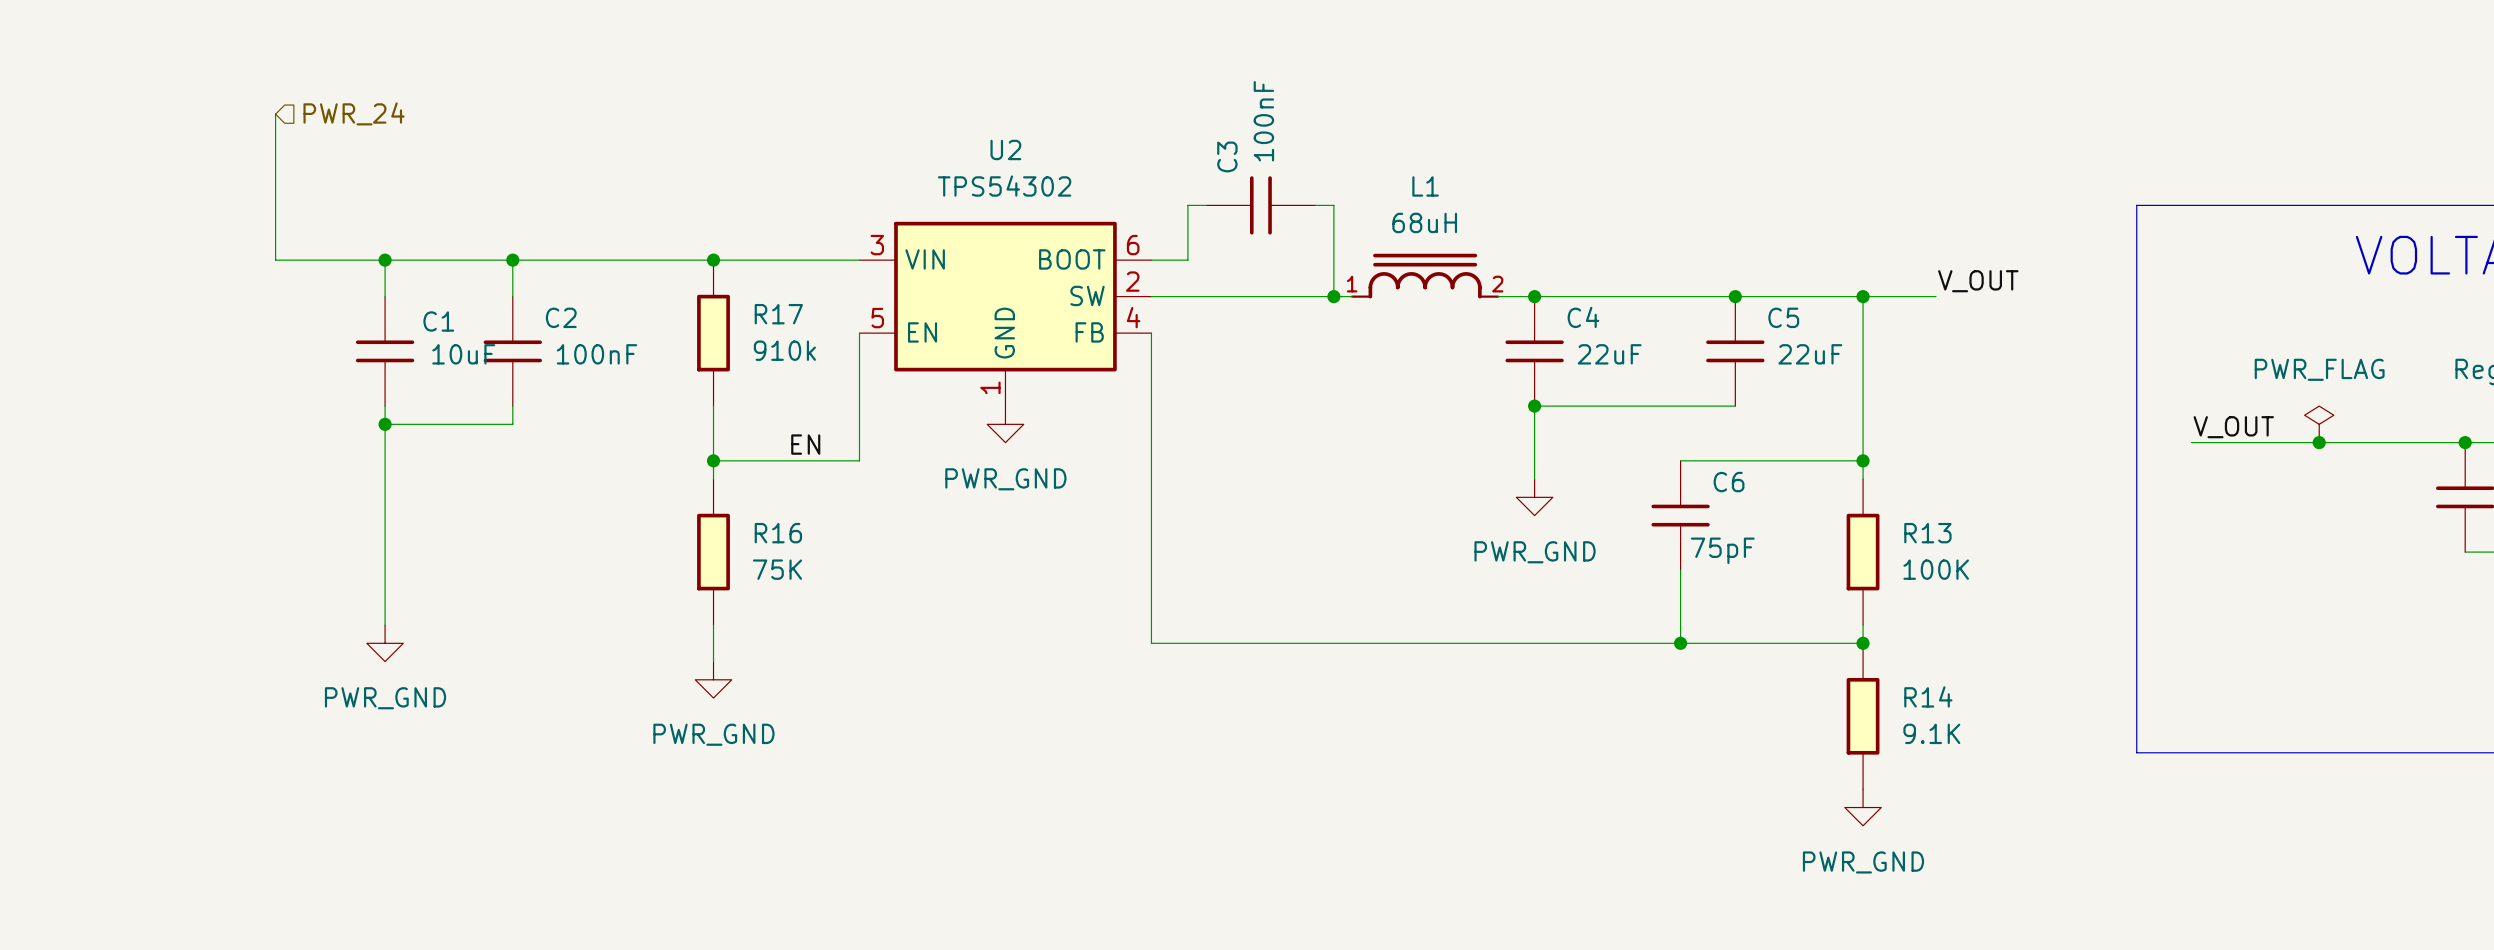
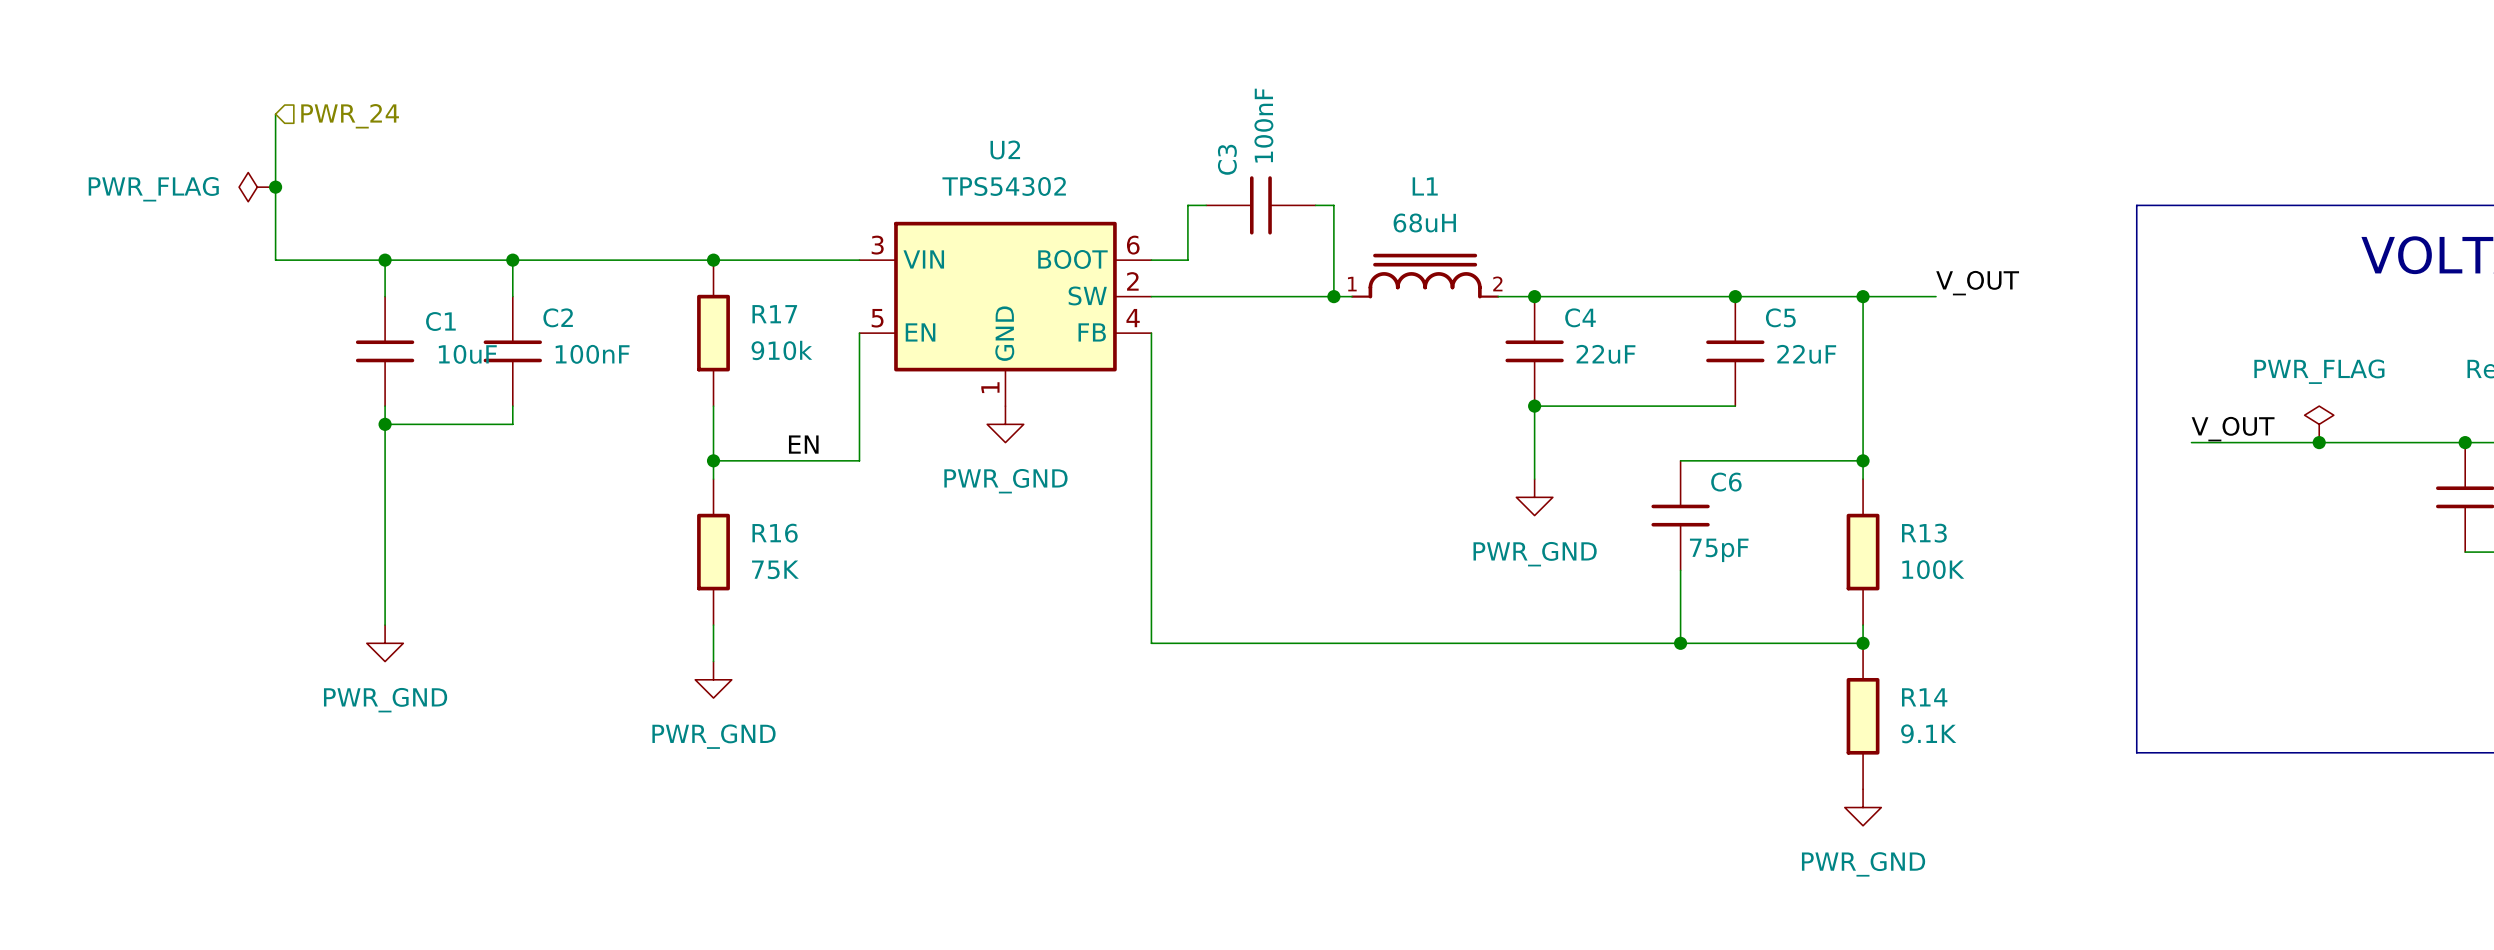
power symbol: none -> PWR_FLAG (257, 187)
junction: none -> (275, 187)

